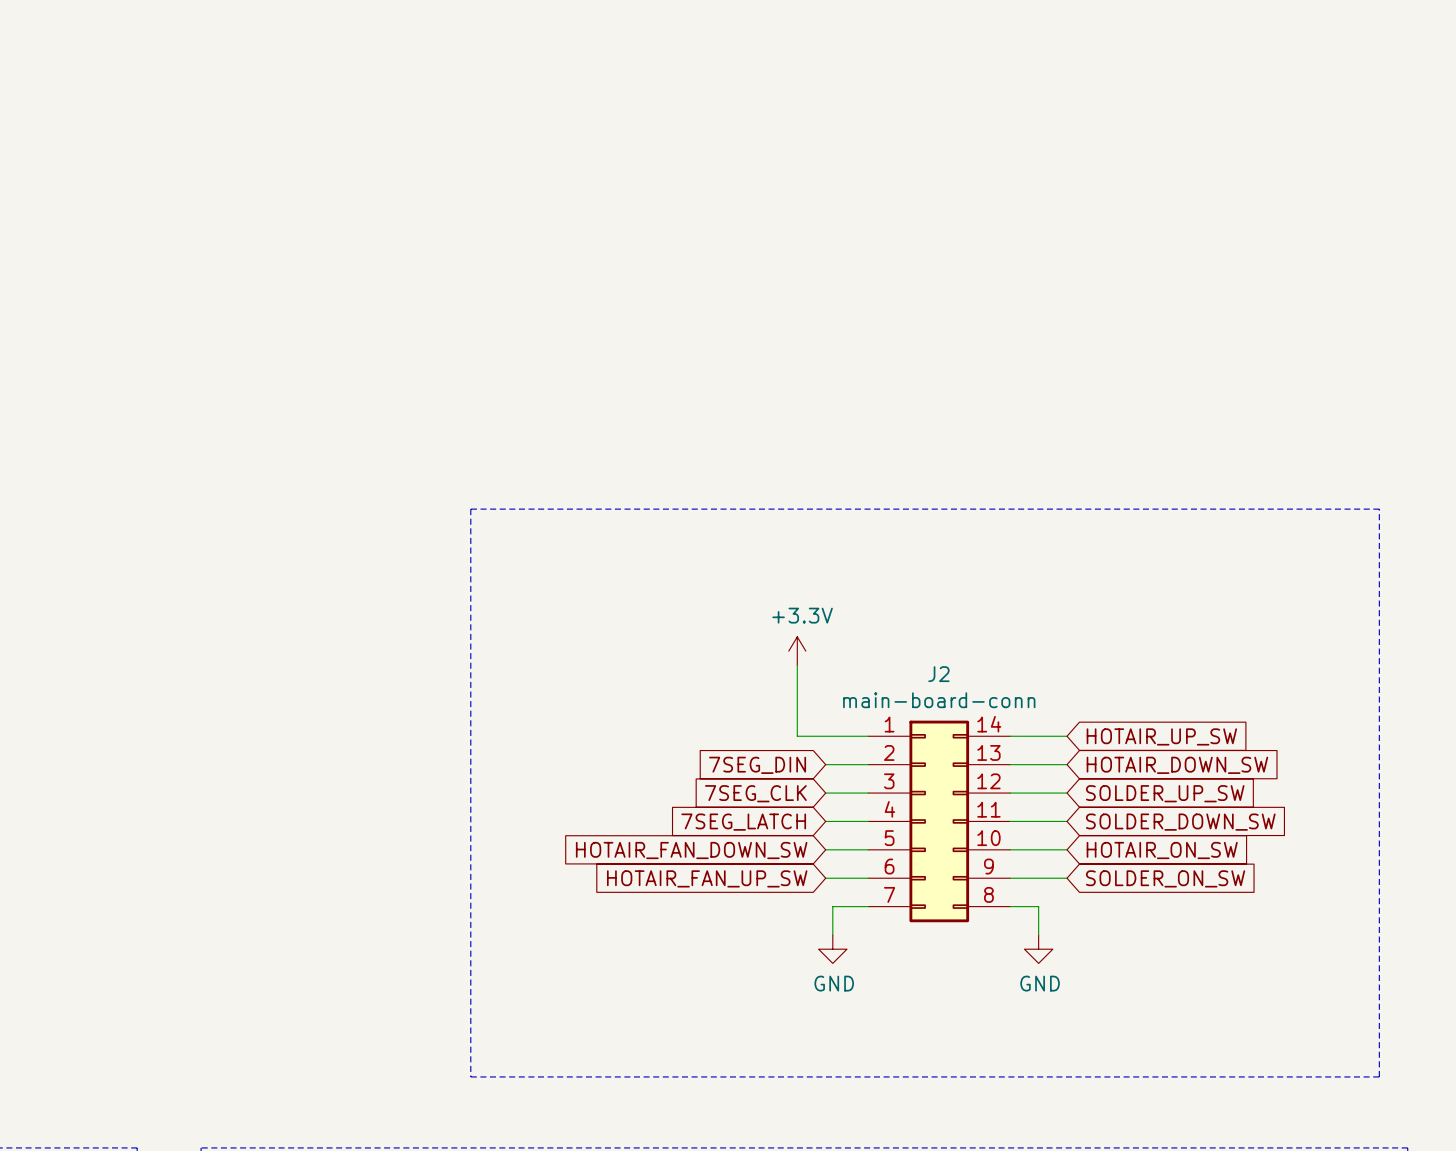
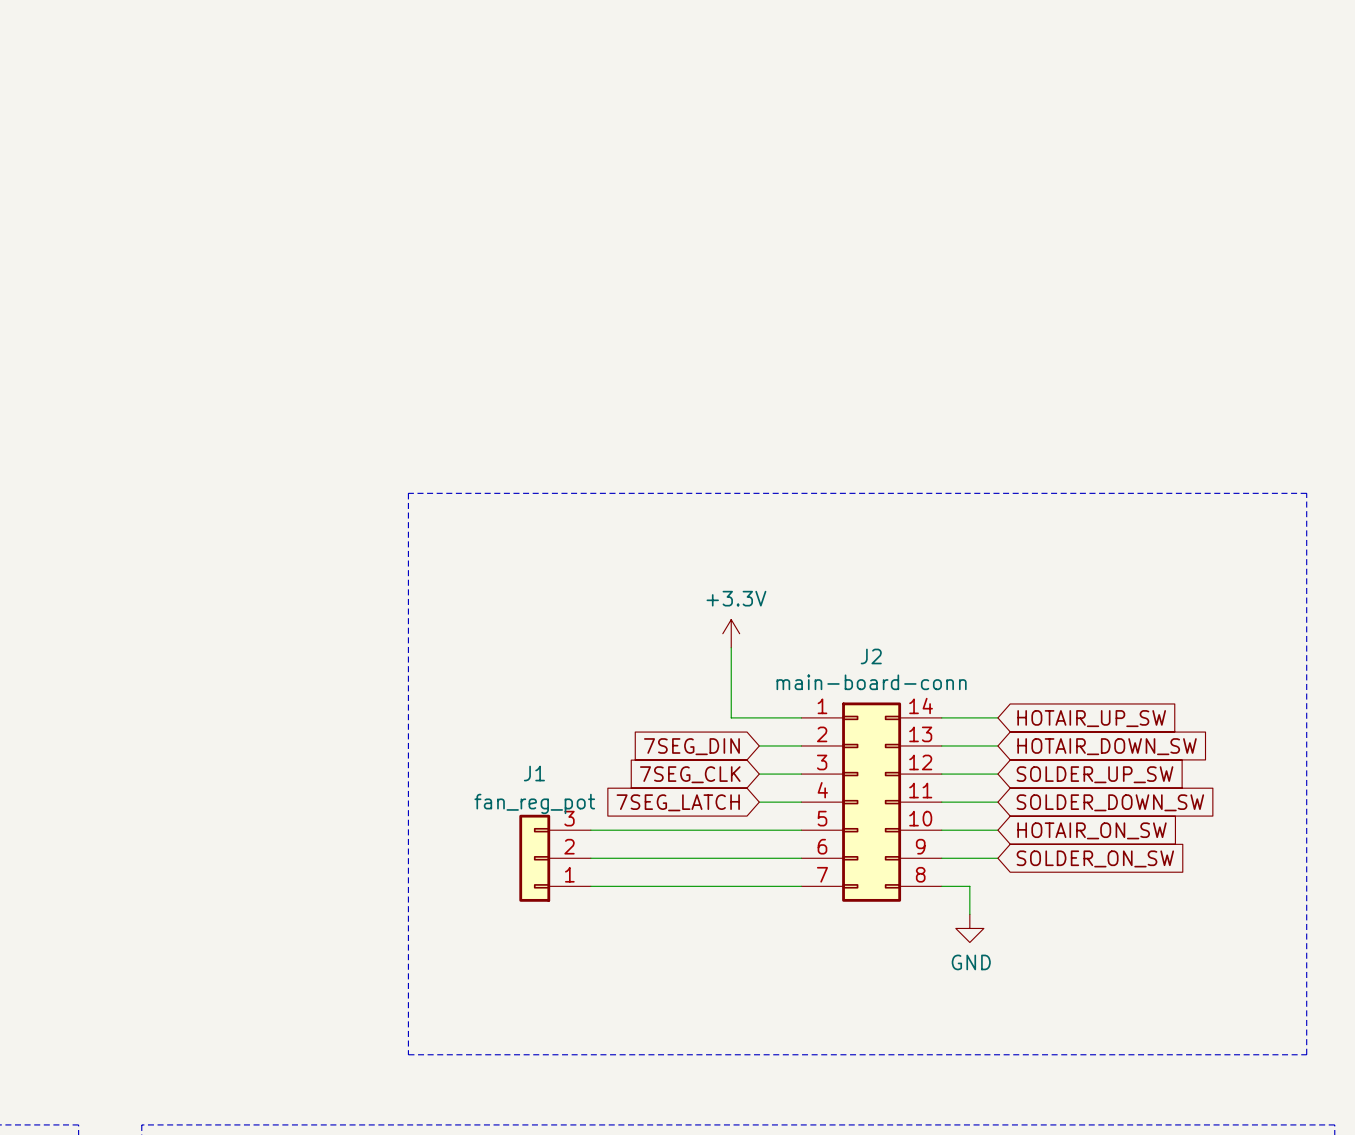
wire: none -> (590, 830) (759, 830)
global label: HOTAIR_FAN_DOWN_SW (691, 850) -> none
J1: none -> fan_reg_pot (555, 858)
wire: none -> (590, 858) (759, 858)
global label: HOTAIR_FAN_UP_SW (707, 878) -> none
wire: (832, 906) (832, 935) -> (766, 886) (590, 886)
power symbol: GND (832, 949) -> none

